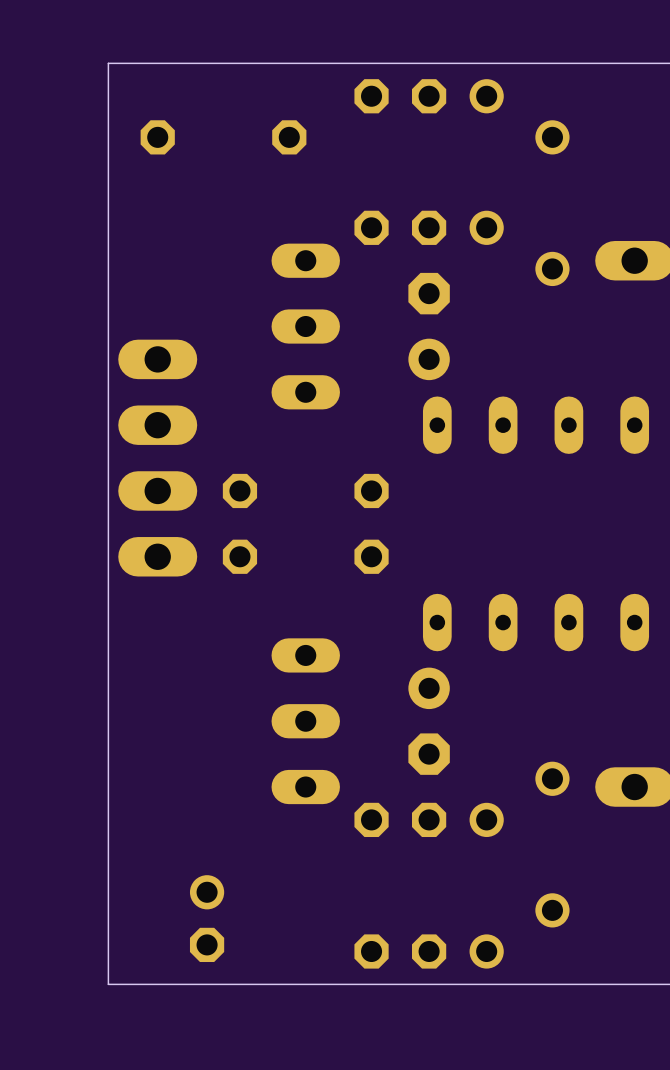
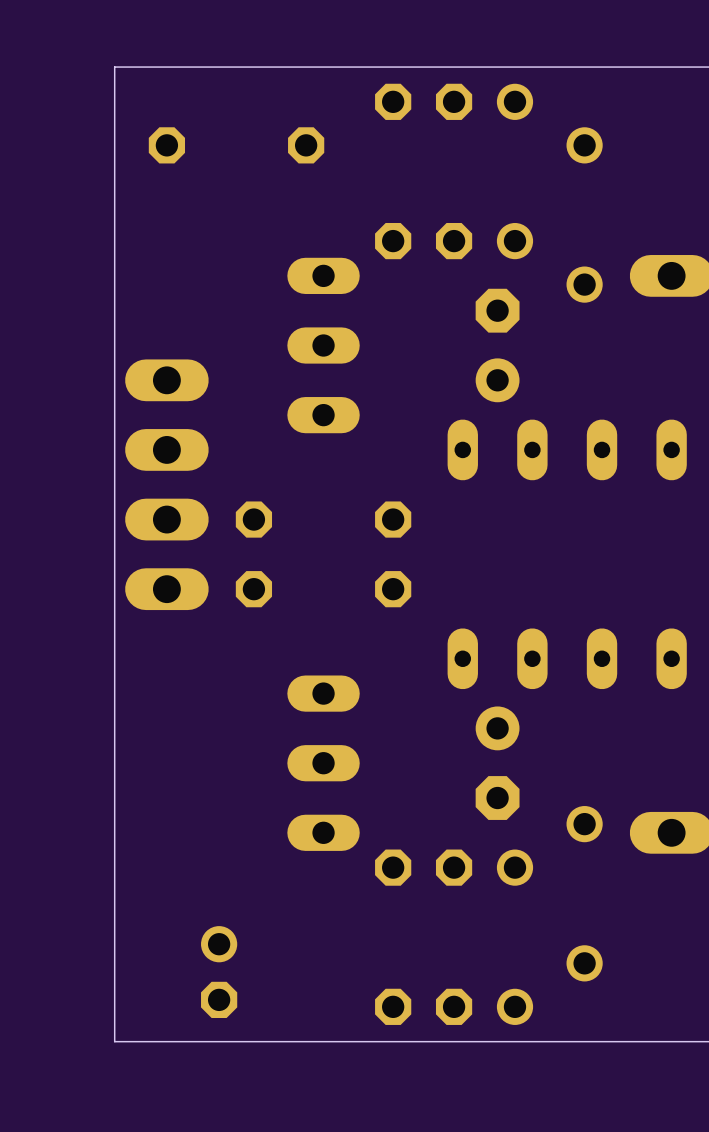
part position: (429, 326) -> (497, 345)
part position: (429, 721) -> (497, 763)

